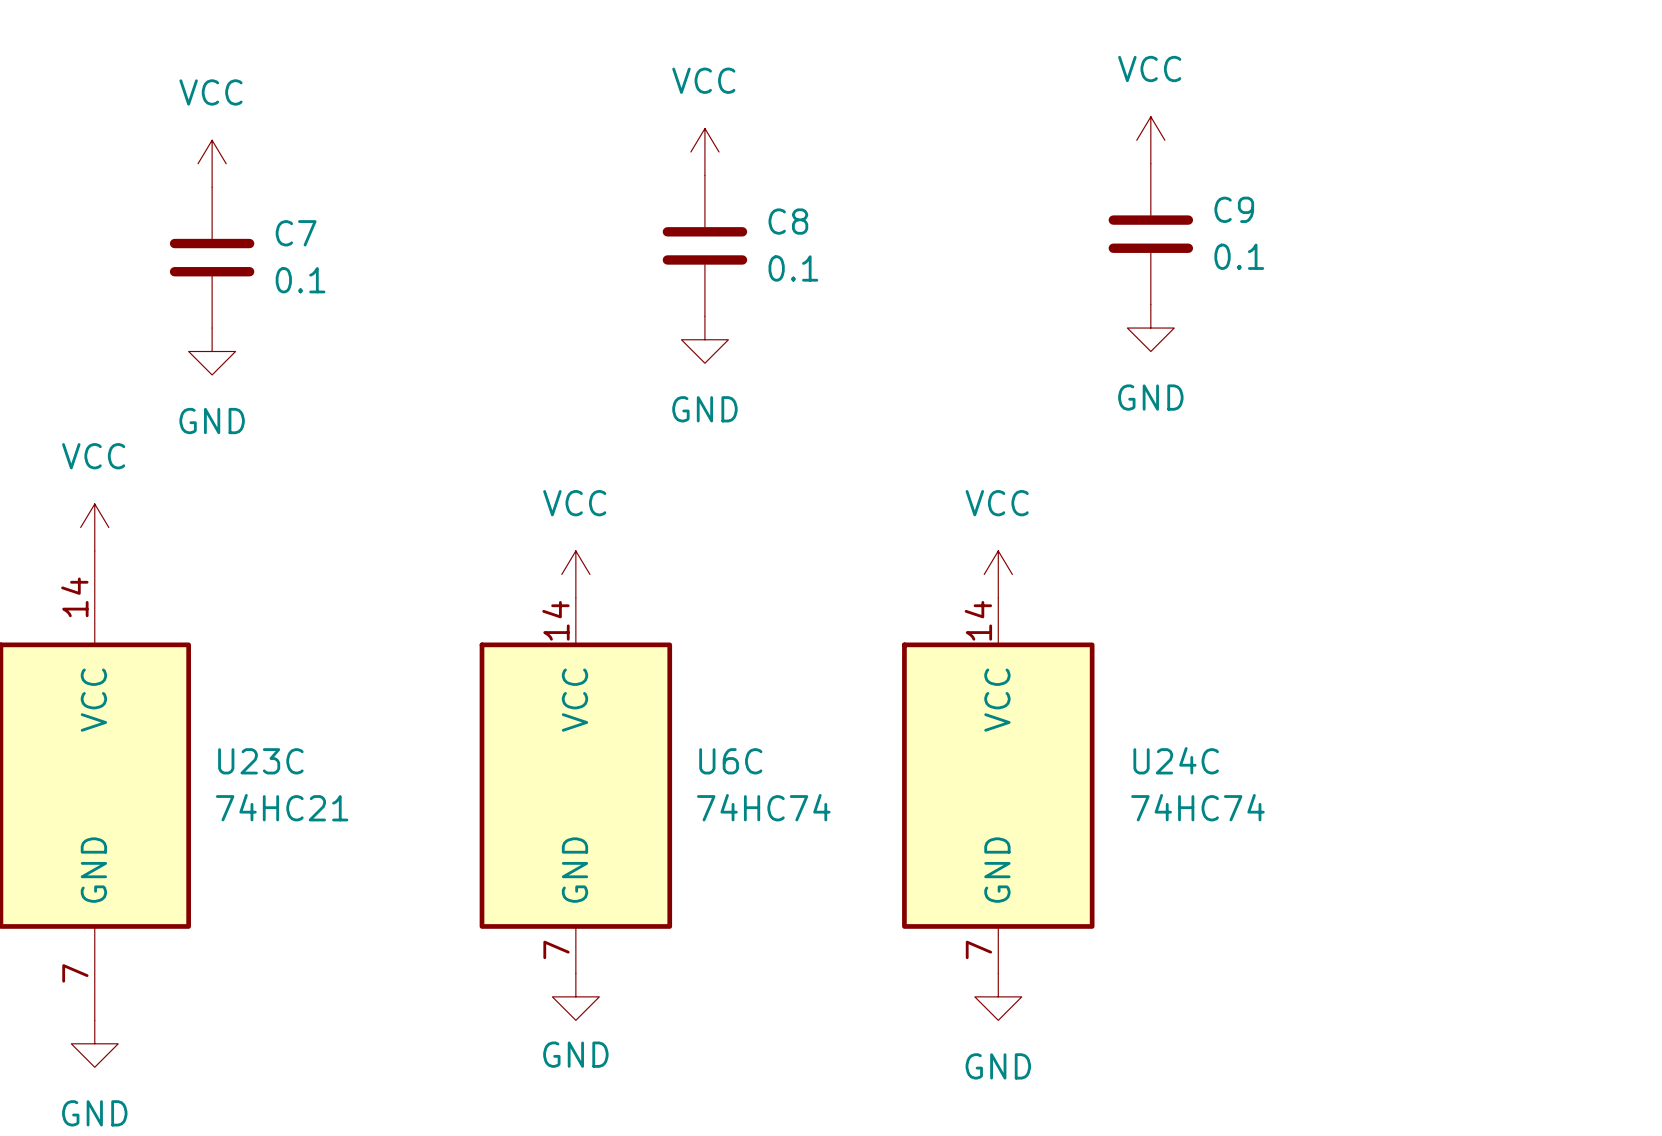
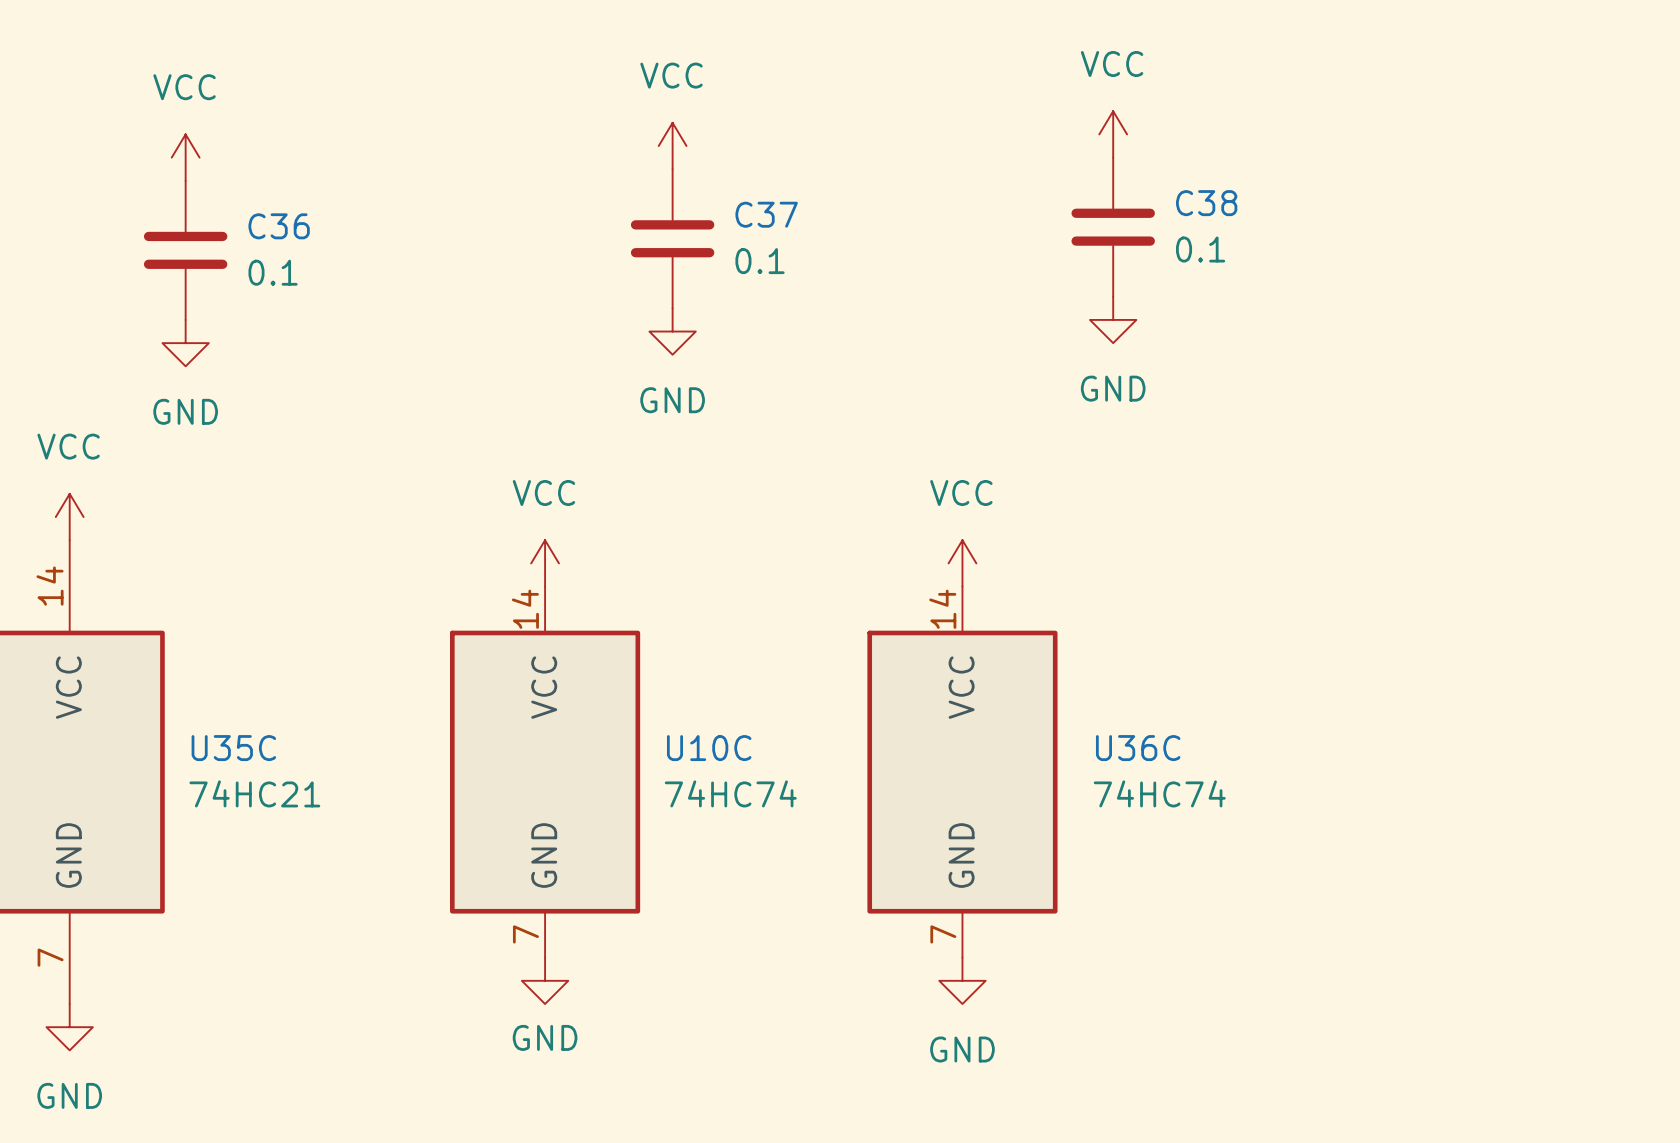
C9 name: C9 (1234, 209) -> C38 (1206, 203)
C8 name: C8 (788, 221) -> C37 (766, 214)
C7 name: C7 (296, 233) -> C36 (279, 226)
U24C name: U24C (1176, 760) -> U36C (1138, 748)
U23C name: U23C (260, 761) -> U35C (233, 748)
U6C name: U6C (730, 761) -> U10C (709, 748)

